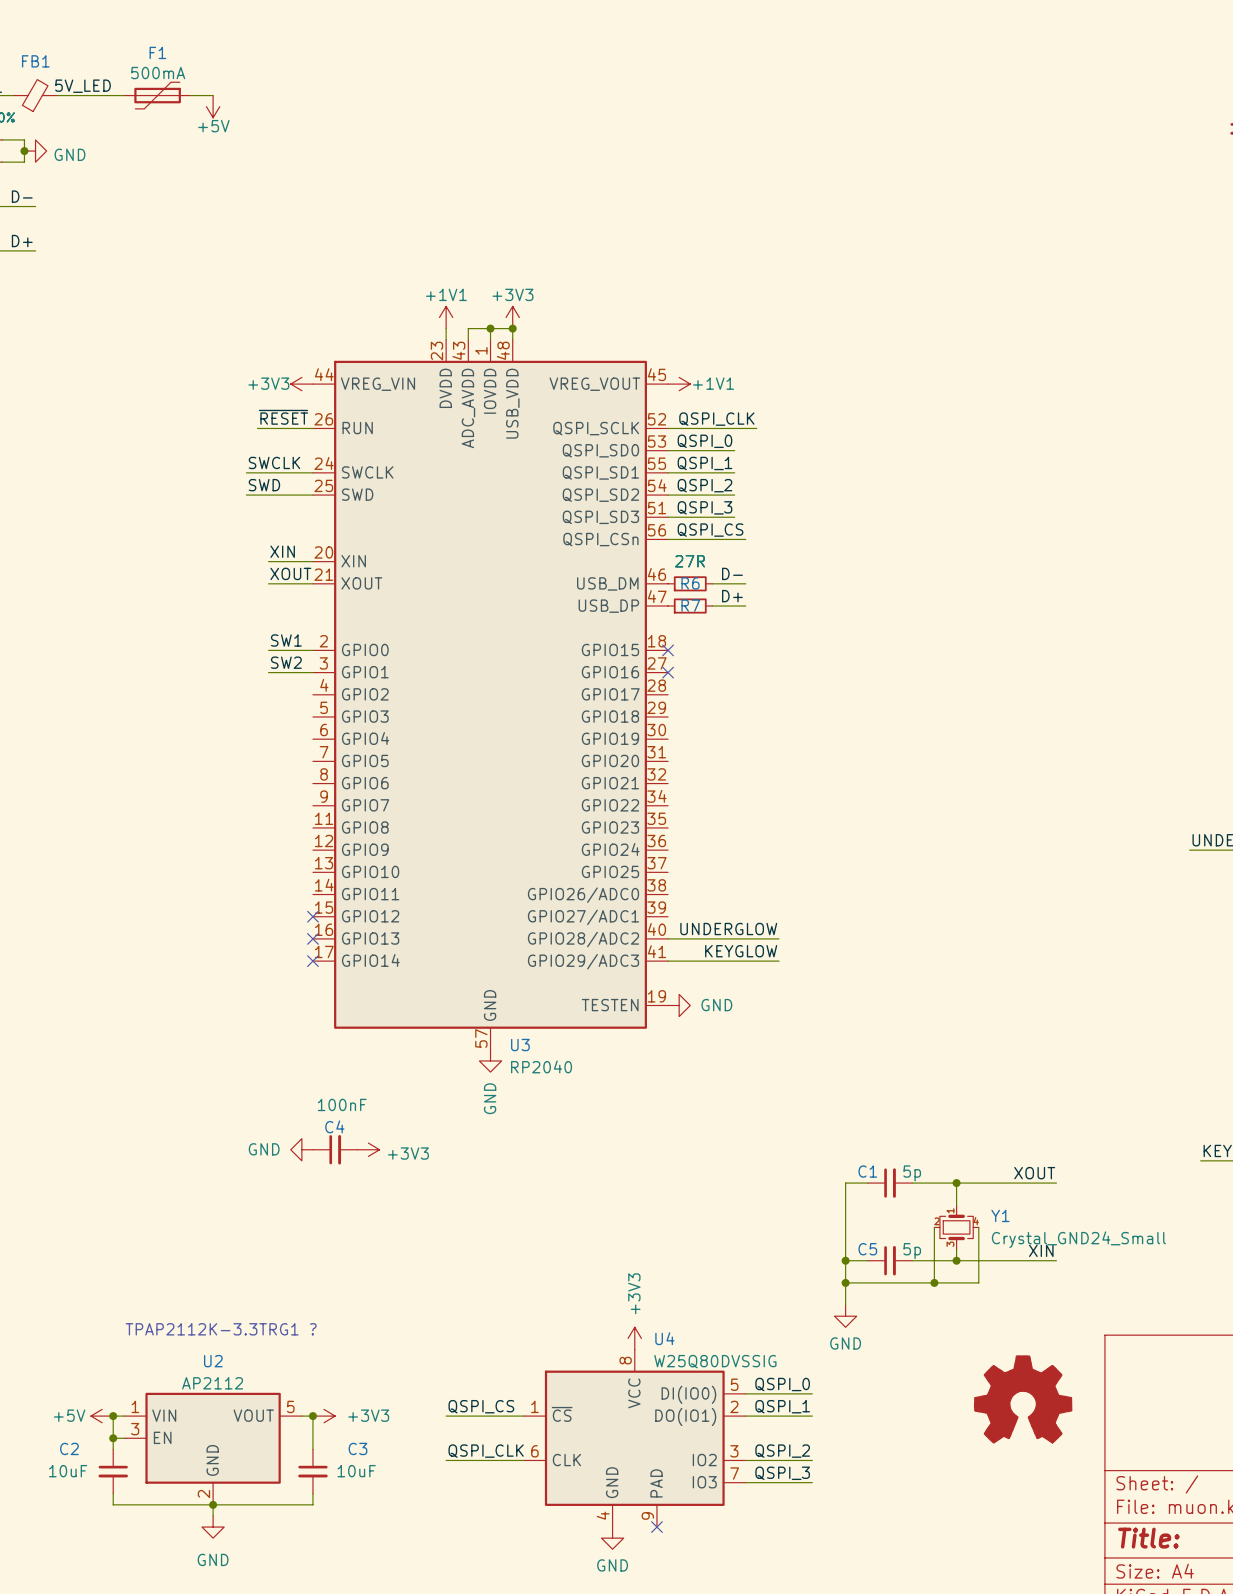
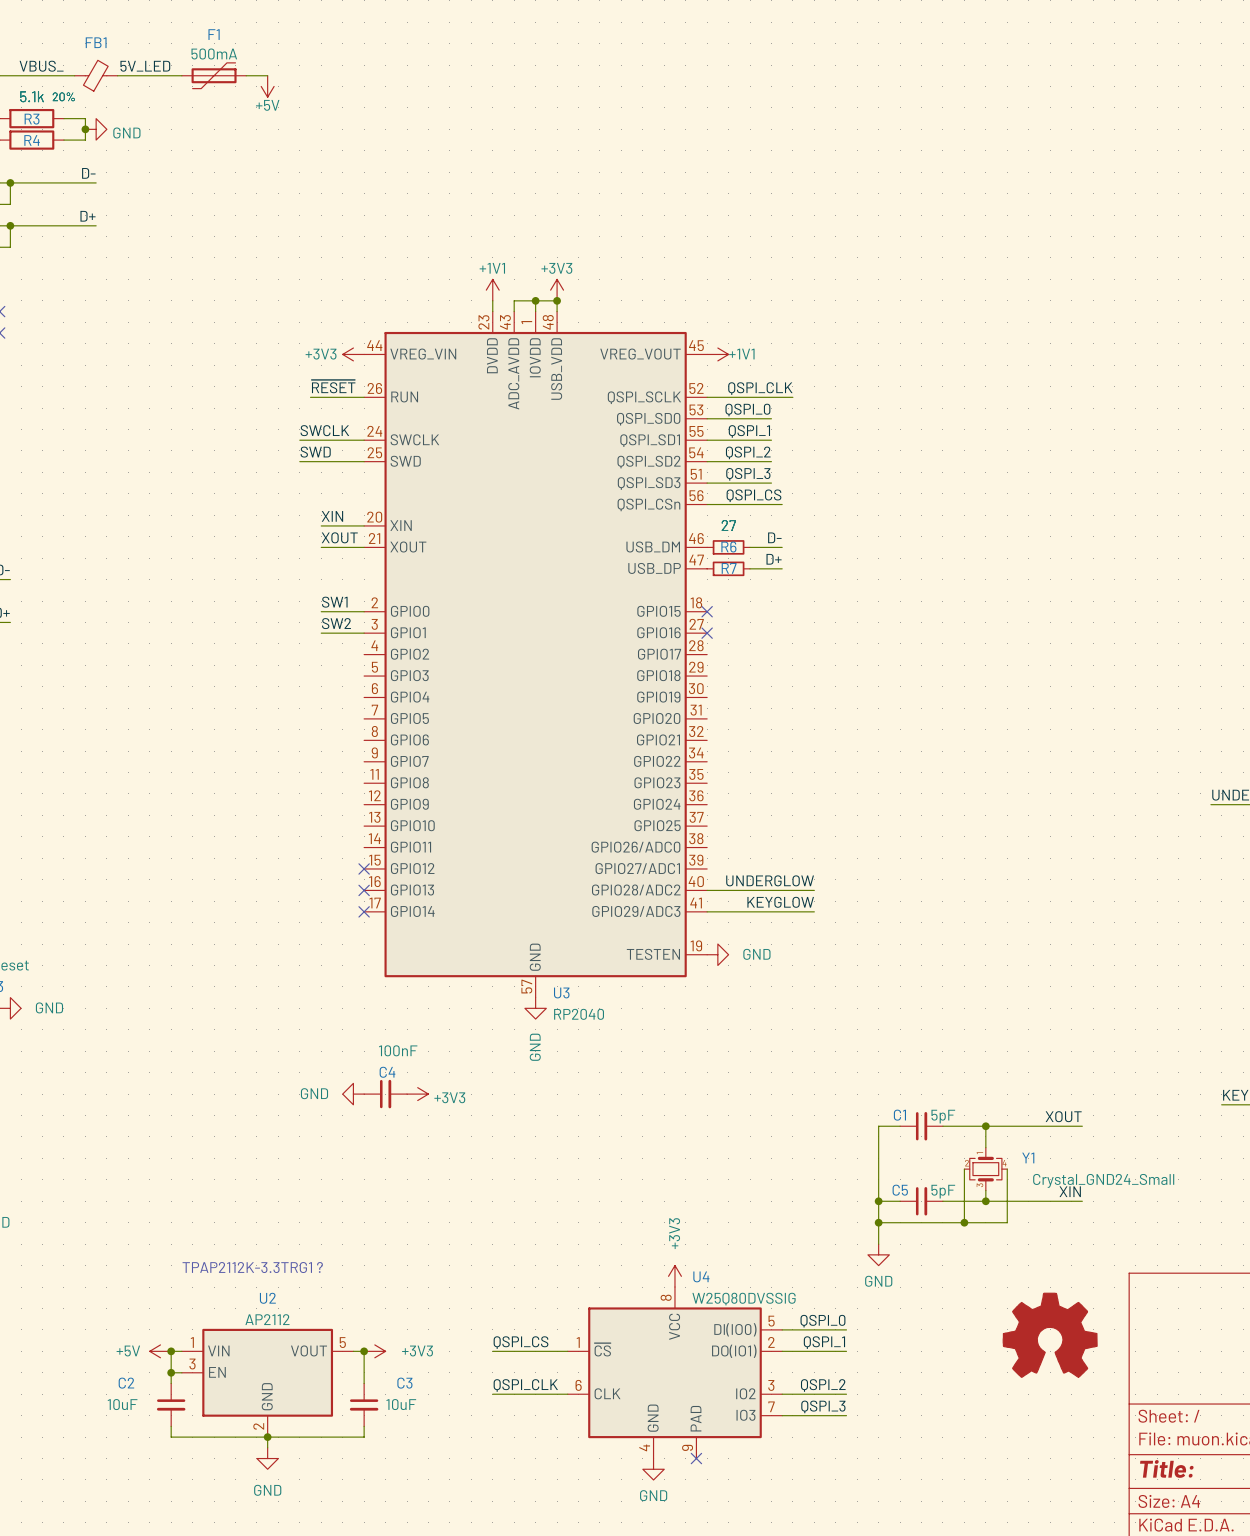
R7 value: 27R (689, 561) -> 27 (728, 525)
R6 value: 27R (689, 561) -> 27 (728, 525)
C1 value: 5p (912, 1173) -> 5pF (943, 1116)
C5 value: 5p (912, 1251) -> 5pF (943, 1191)

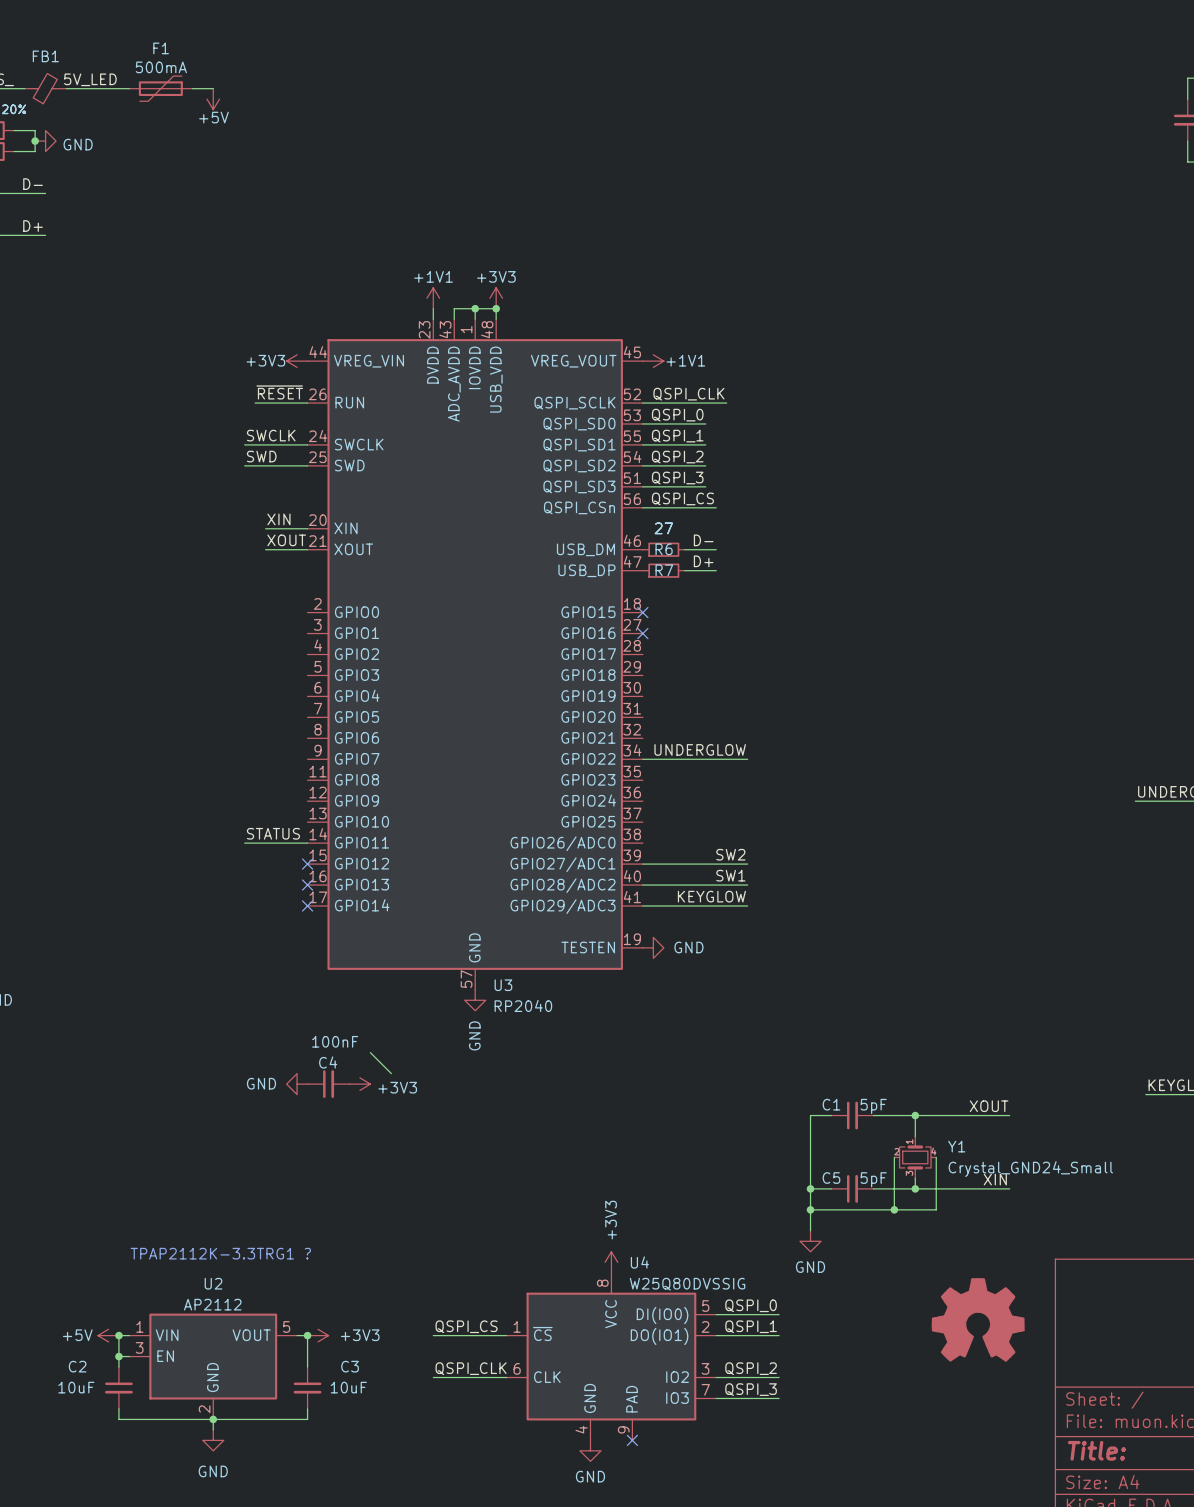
label: SW1 (334, 602) -> none
wire: (321, 611) (364, 611) -> none
label: SW2 (336, 623) -> none
wire: (321, 633) (364, 633) -> none
label: none -> UNDERGLOW (700, 749)
wire: none -> (642, 759) (747, 759)
label: none -> STATUS (273, 833)
wire: none -> (244, 843) (307, 843)
label: none -> SW2 (730, 854)
wire: none -> (642, 864) (747, 864)
label: UNDERGLOW (770, 880) -> SW1 (730, 875)
wire: none -> (370, 1052) (391, 1073)

